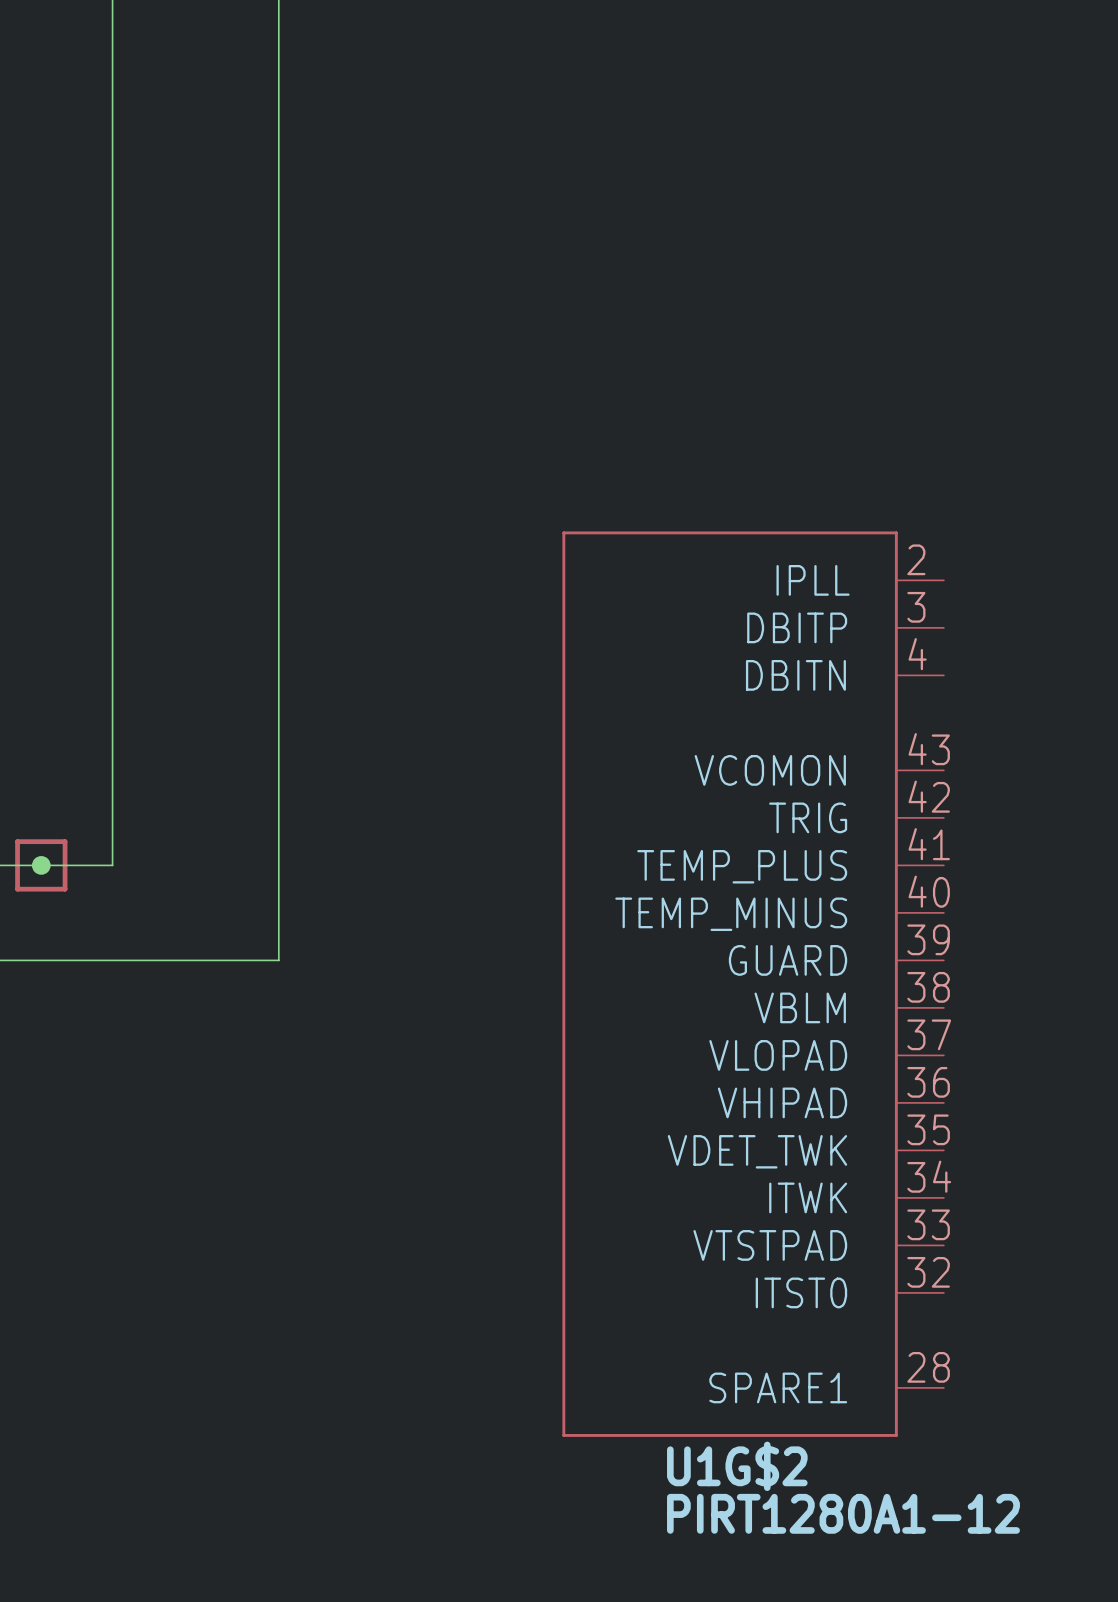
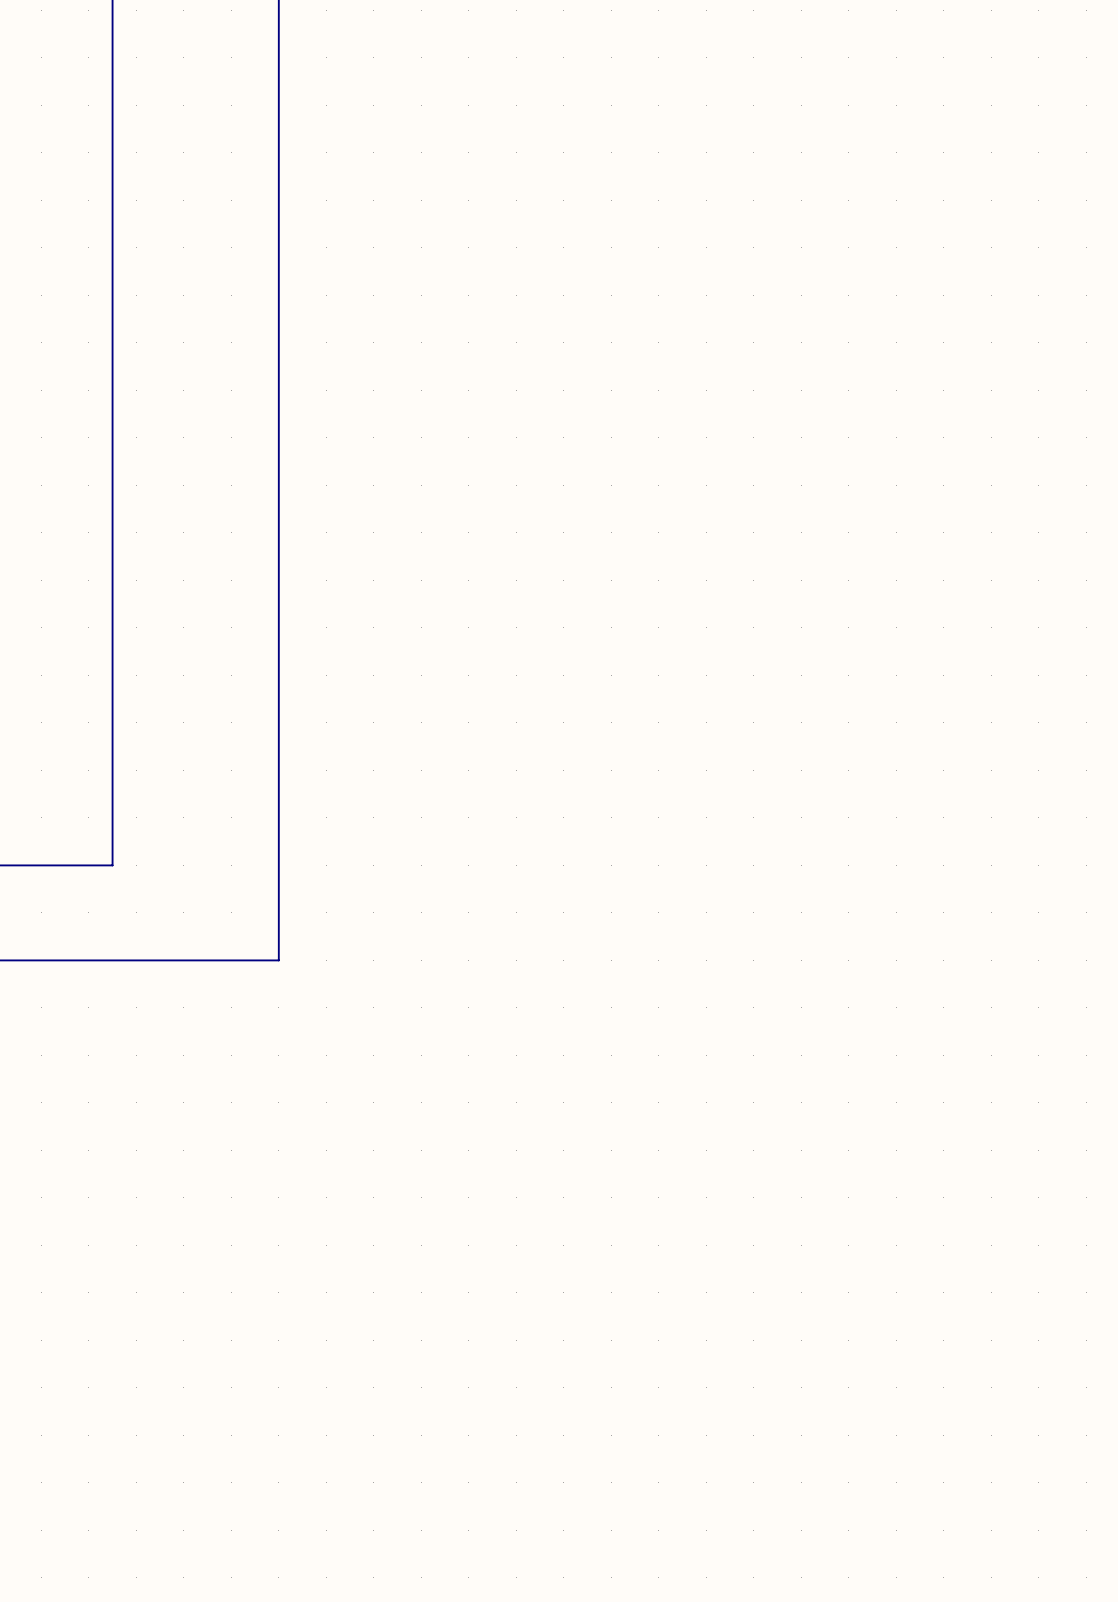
part: (41, 865) -> none
junction: (41, 865) -> none
U1G$2: PIRT1280A1-12 (753, 984) -> none

